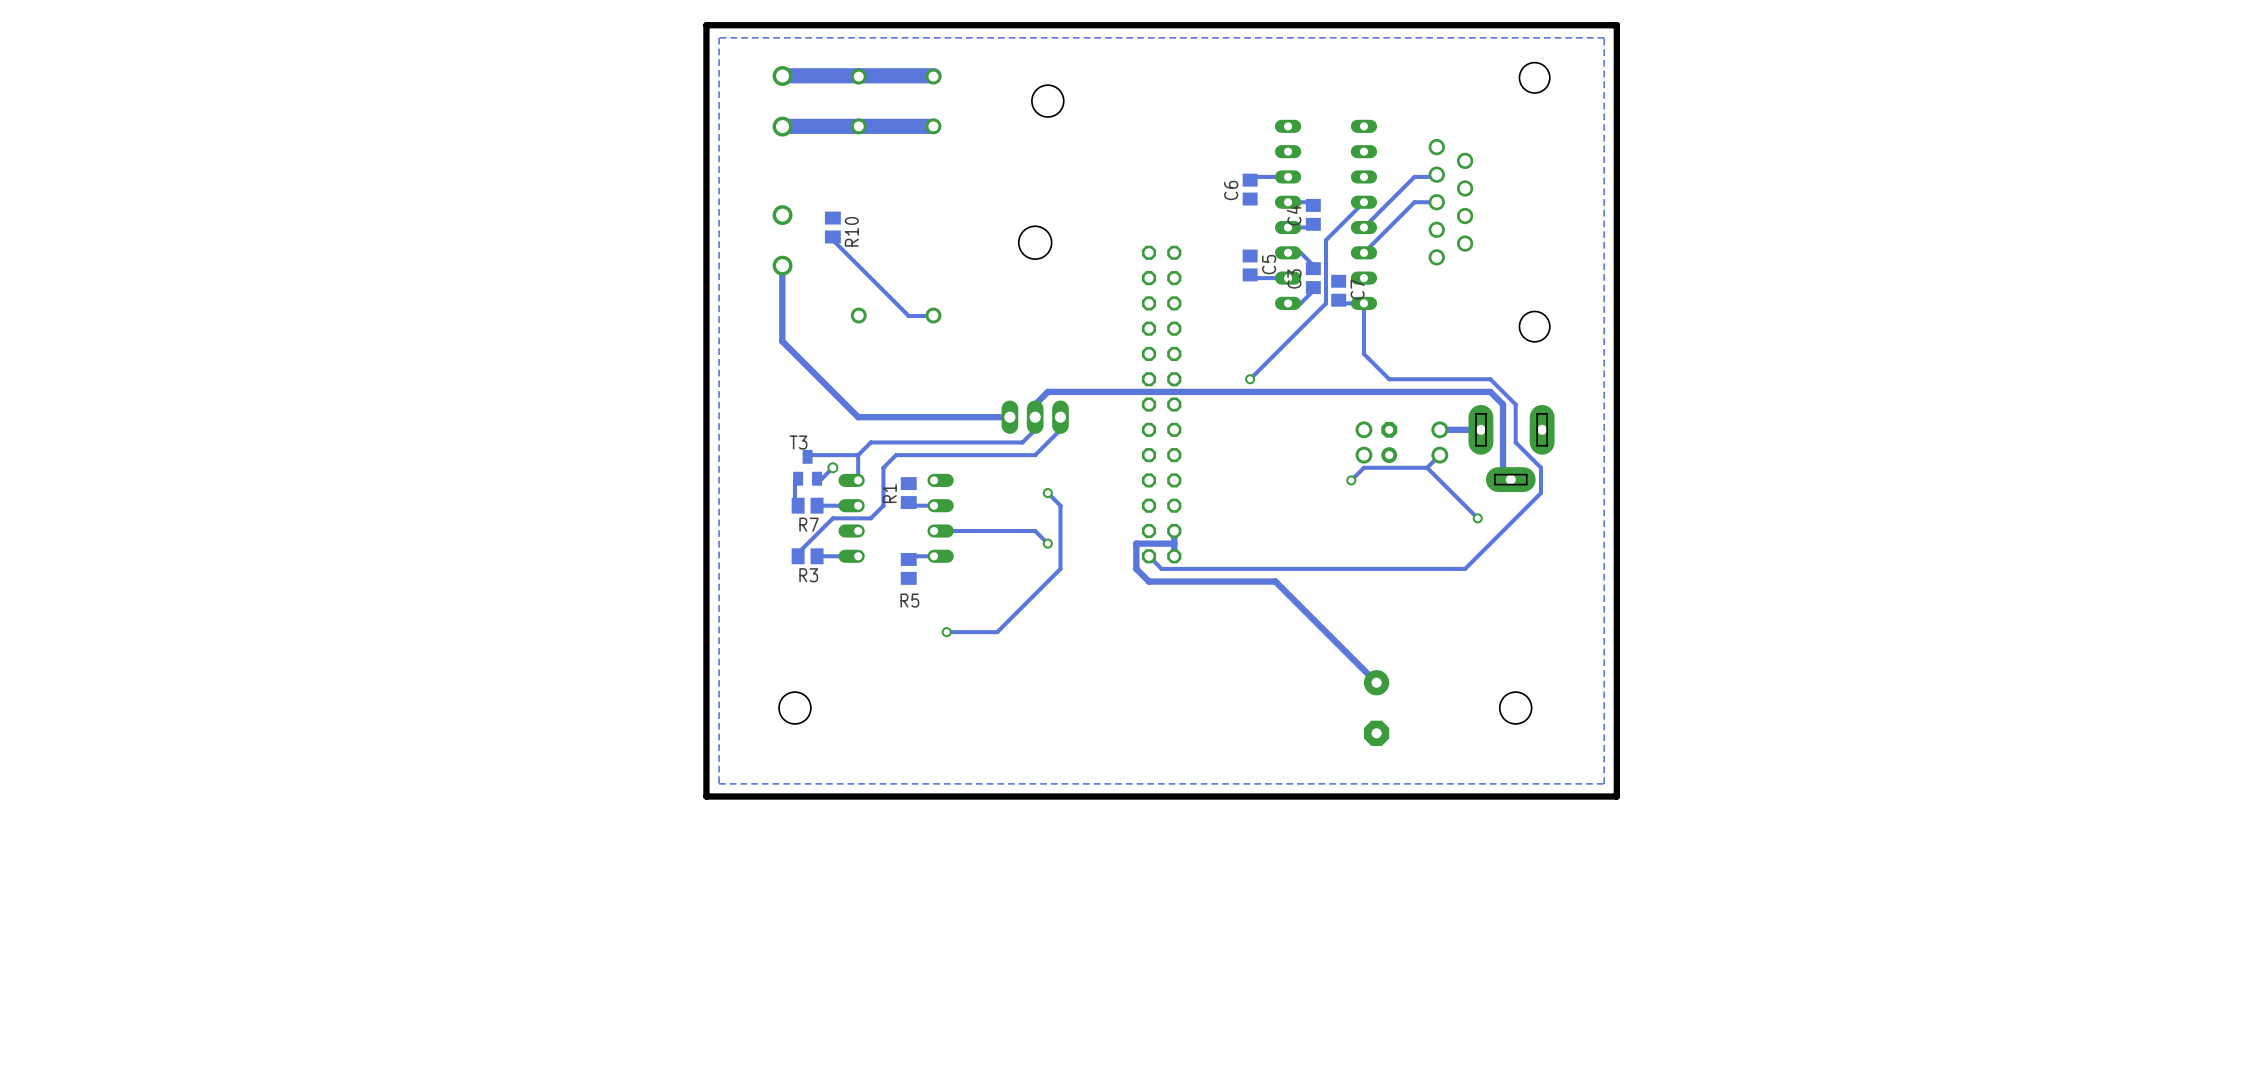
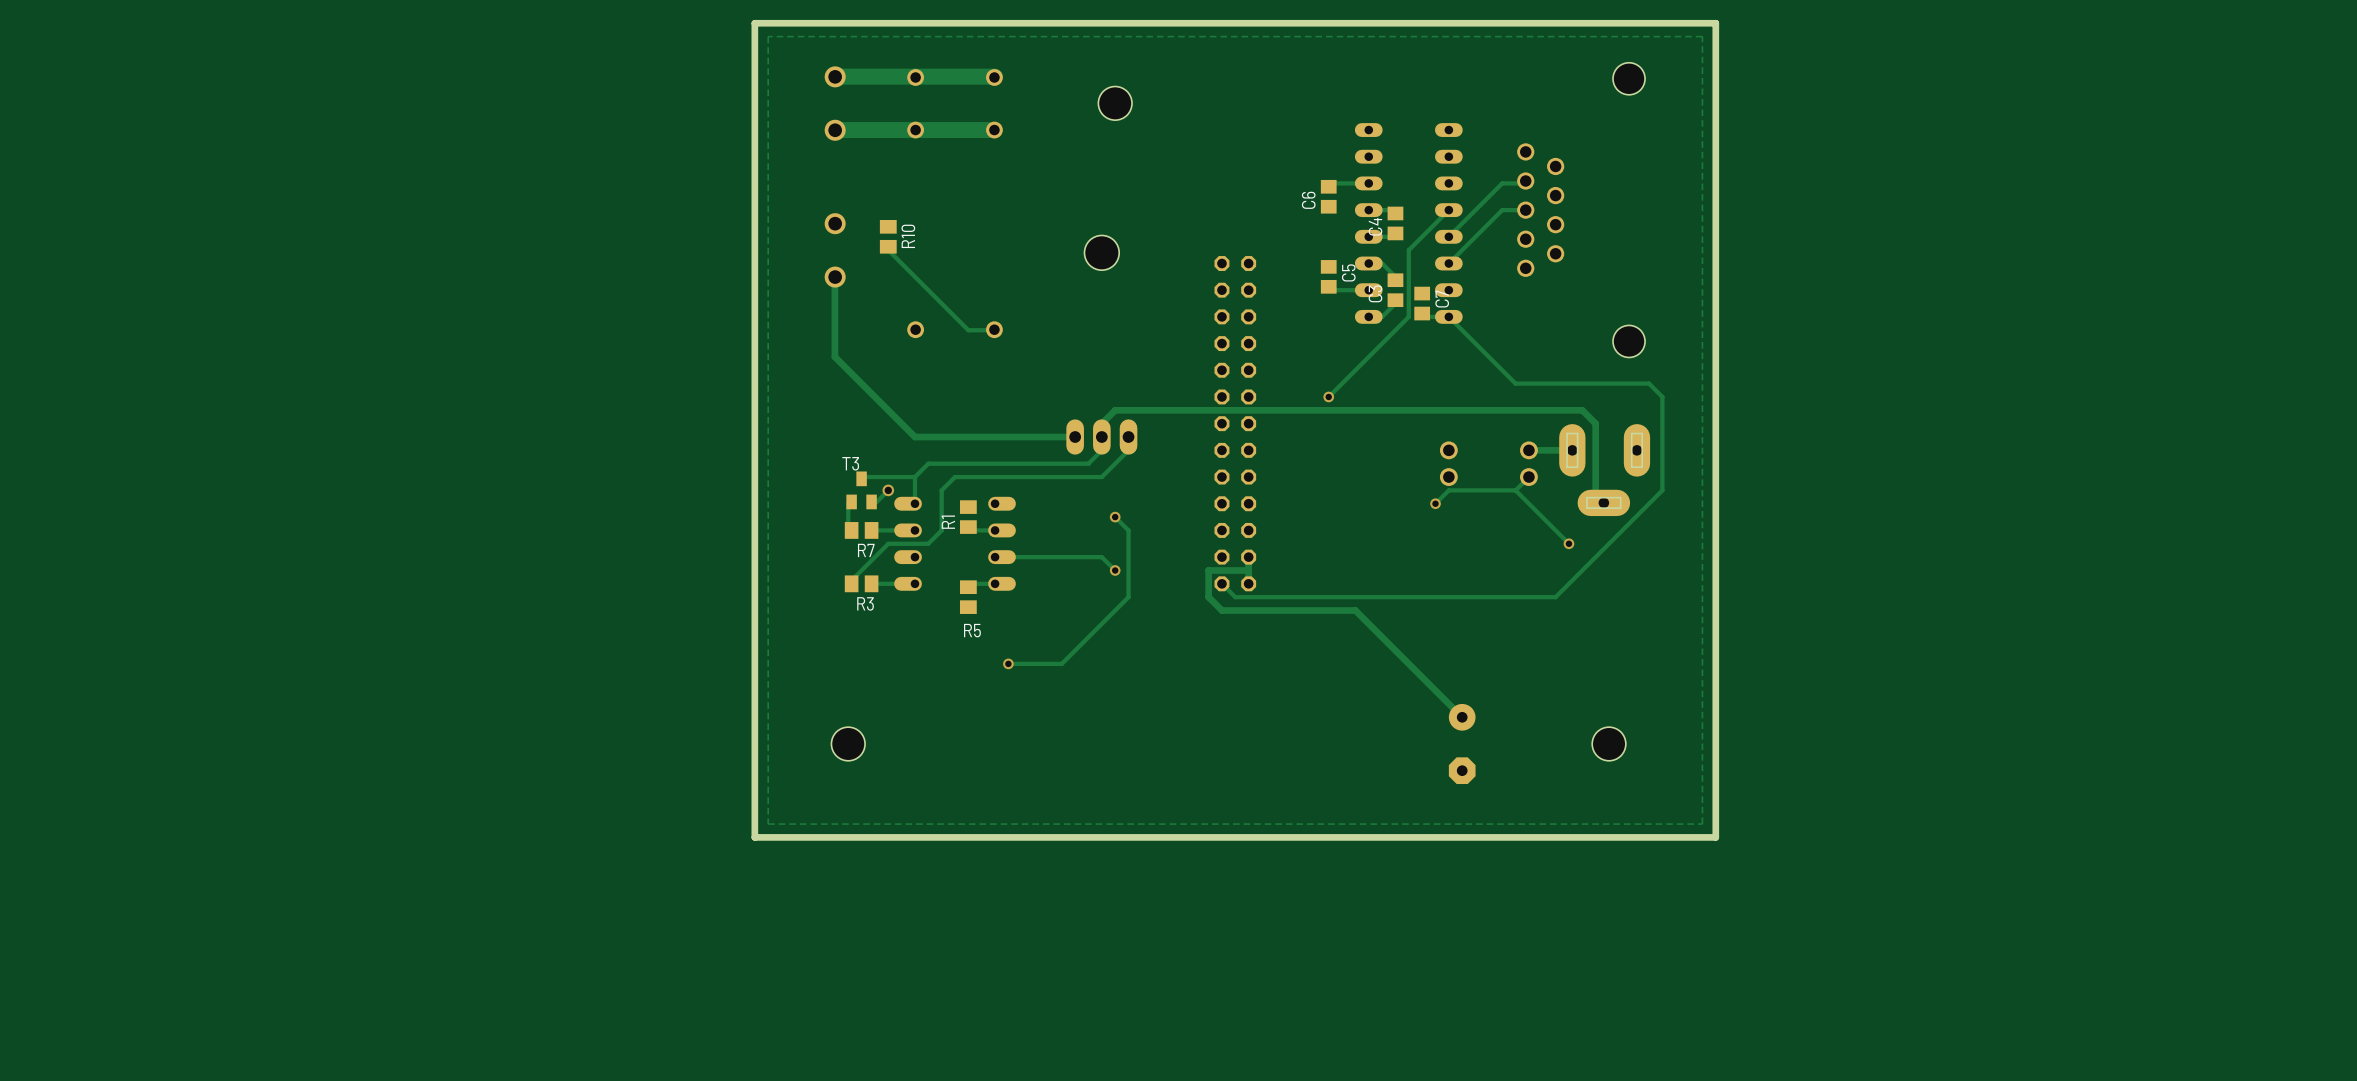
track: (1363, 303) (1363, 353) (1389, 379) (1490, 379) (1515, 404) (1515, 442) (1540, 467) (1540, 493) -> (1448, 316) (1515, 383) (1649, 383) (1662, 396) (1662, 490) (1635, 517)
part: (1389, 442) -> none

